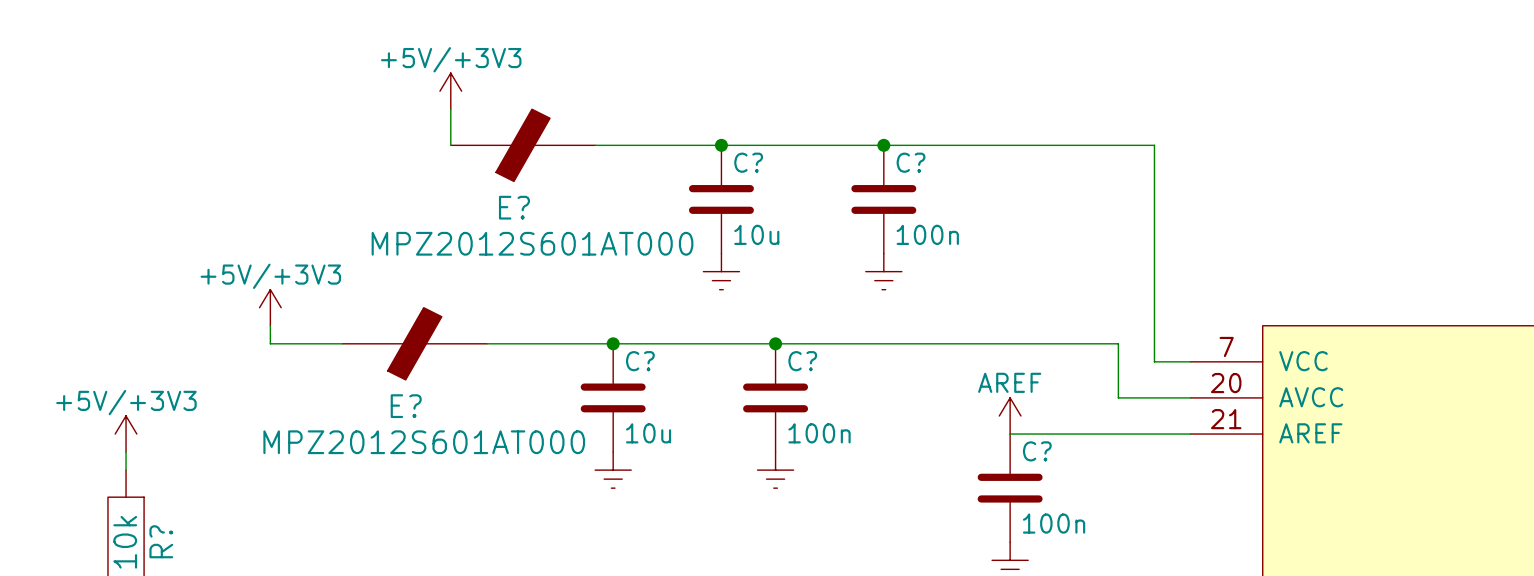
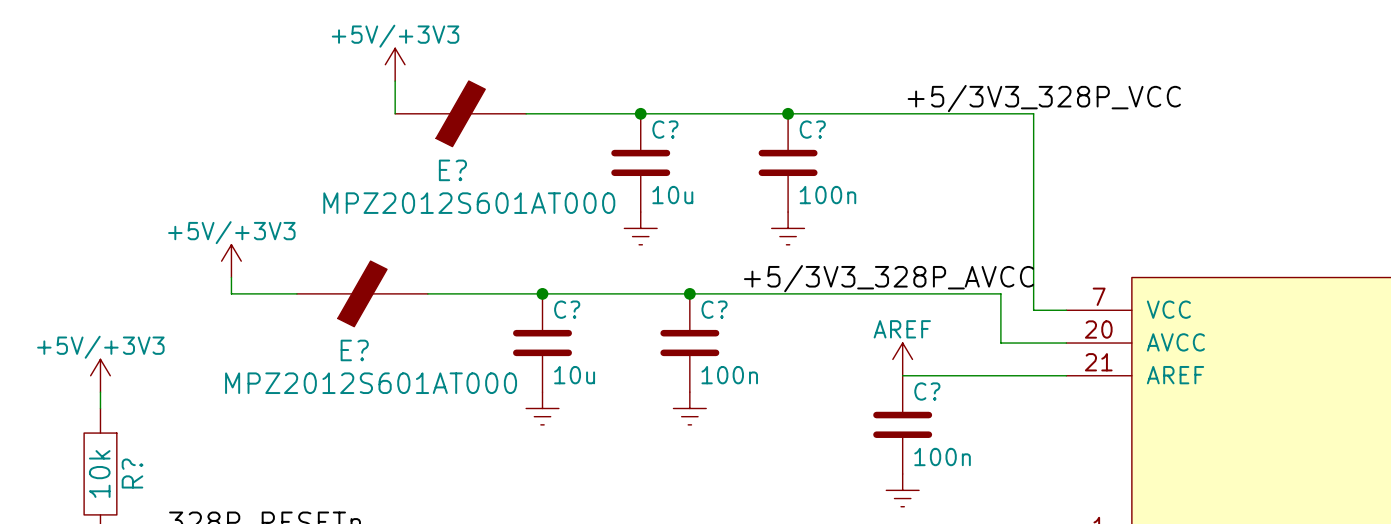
label: none -> +5/3V3_328P_VCC (1044, 98)
label: none -> +5/3V3_328P_AVCC (889, 278)

